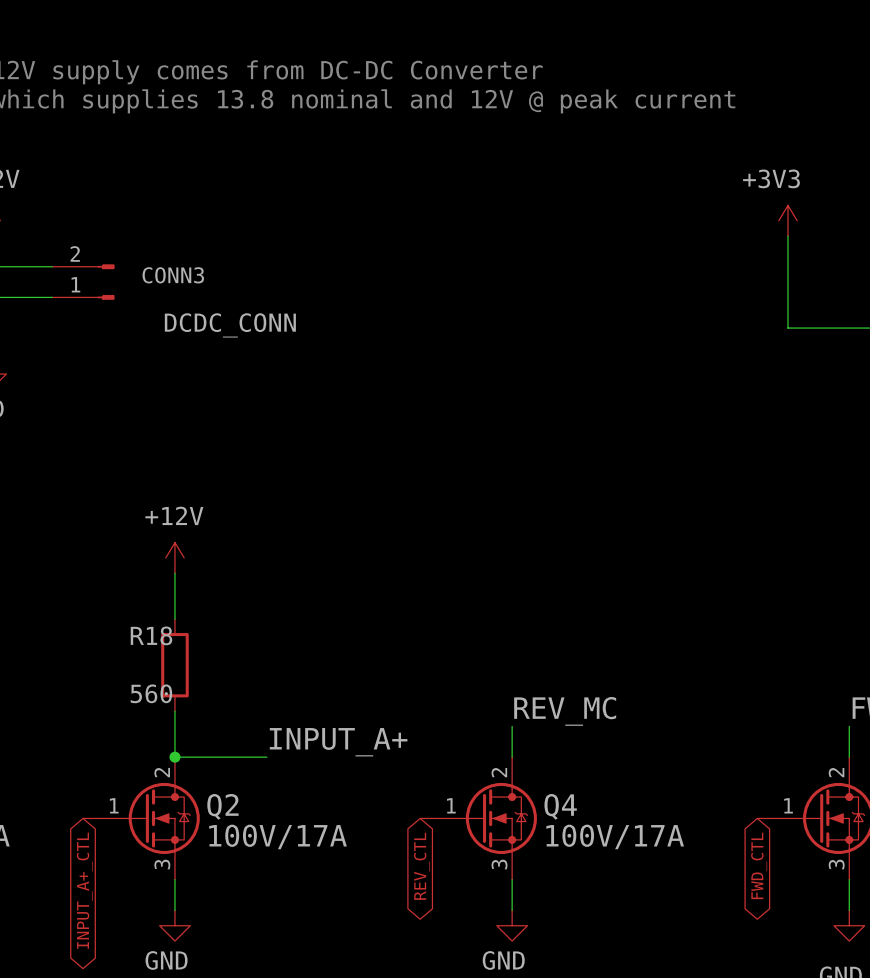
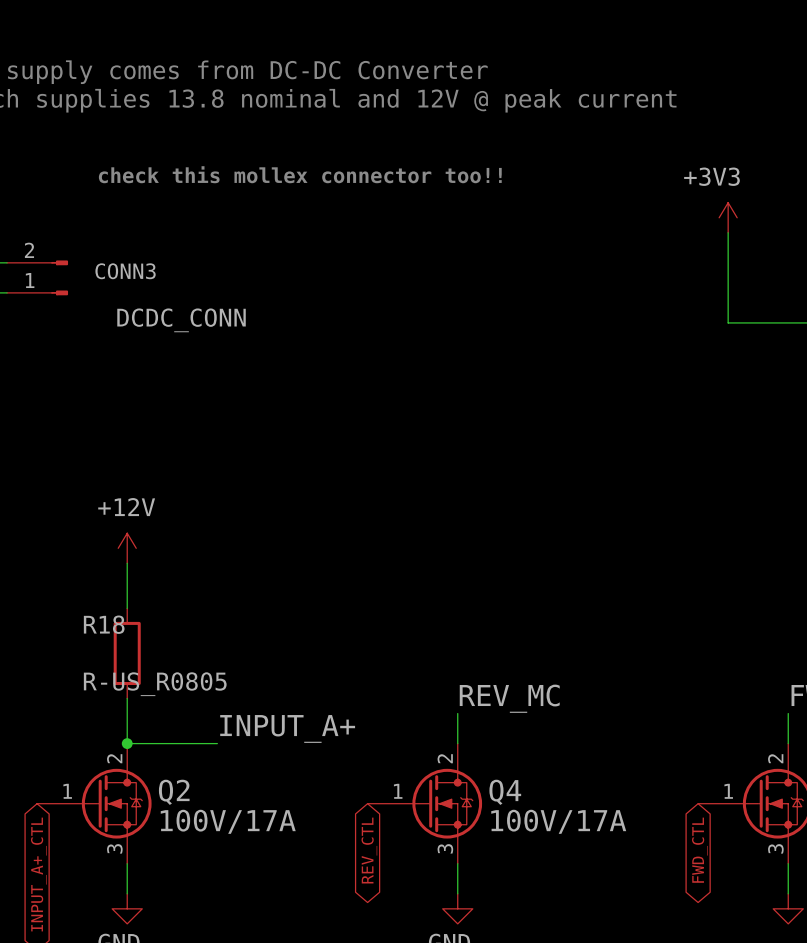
text: none -> check this mollex connector too!! (300, 174)
R18 value: 560 (151, 693) -> R-US_R0805 (155, 684)

